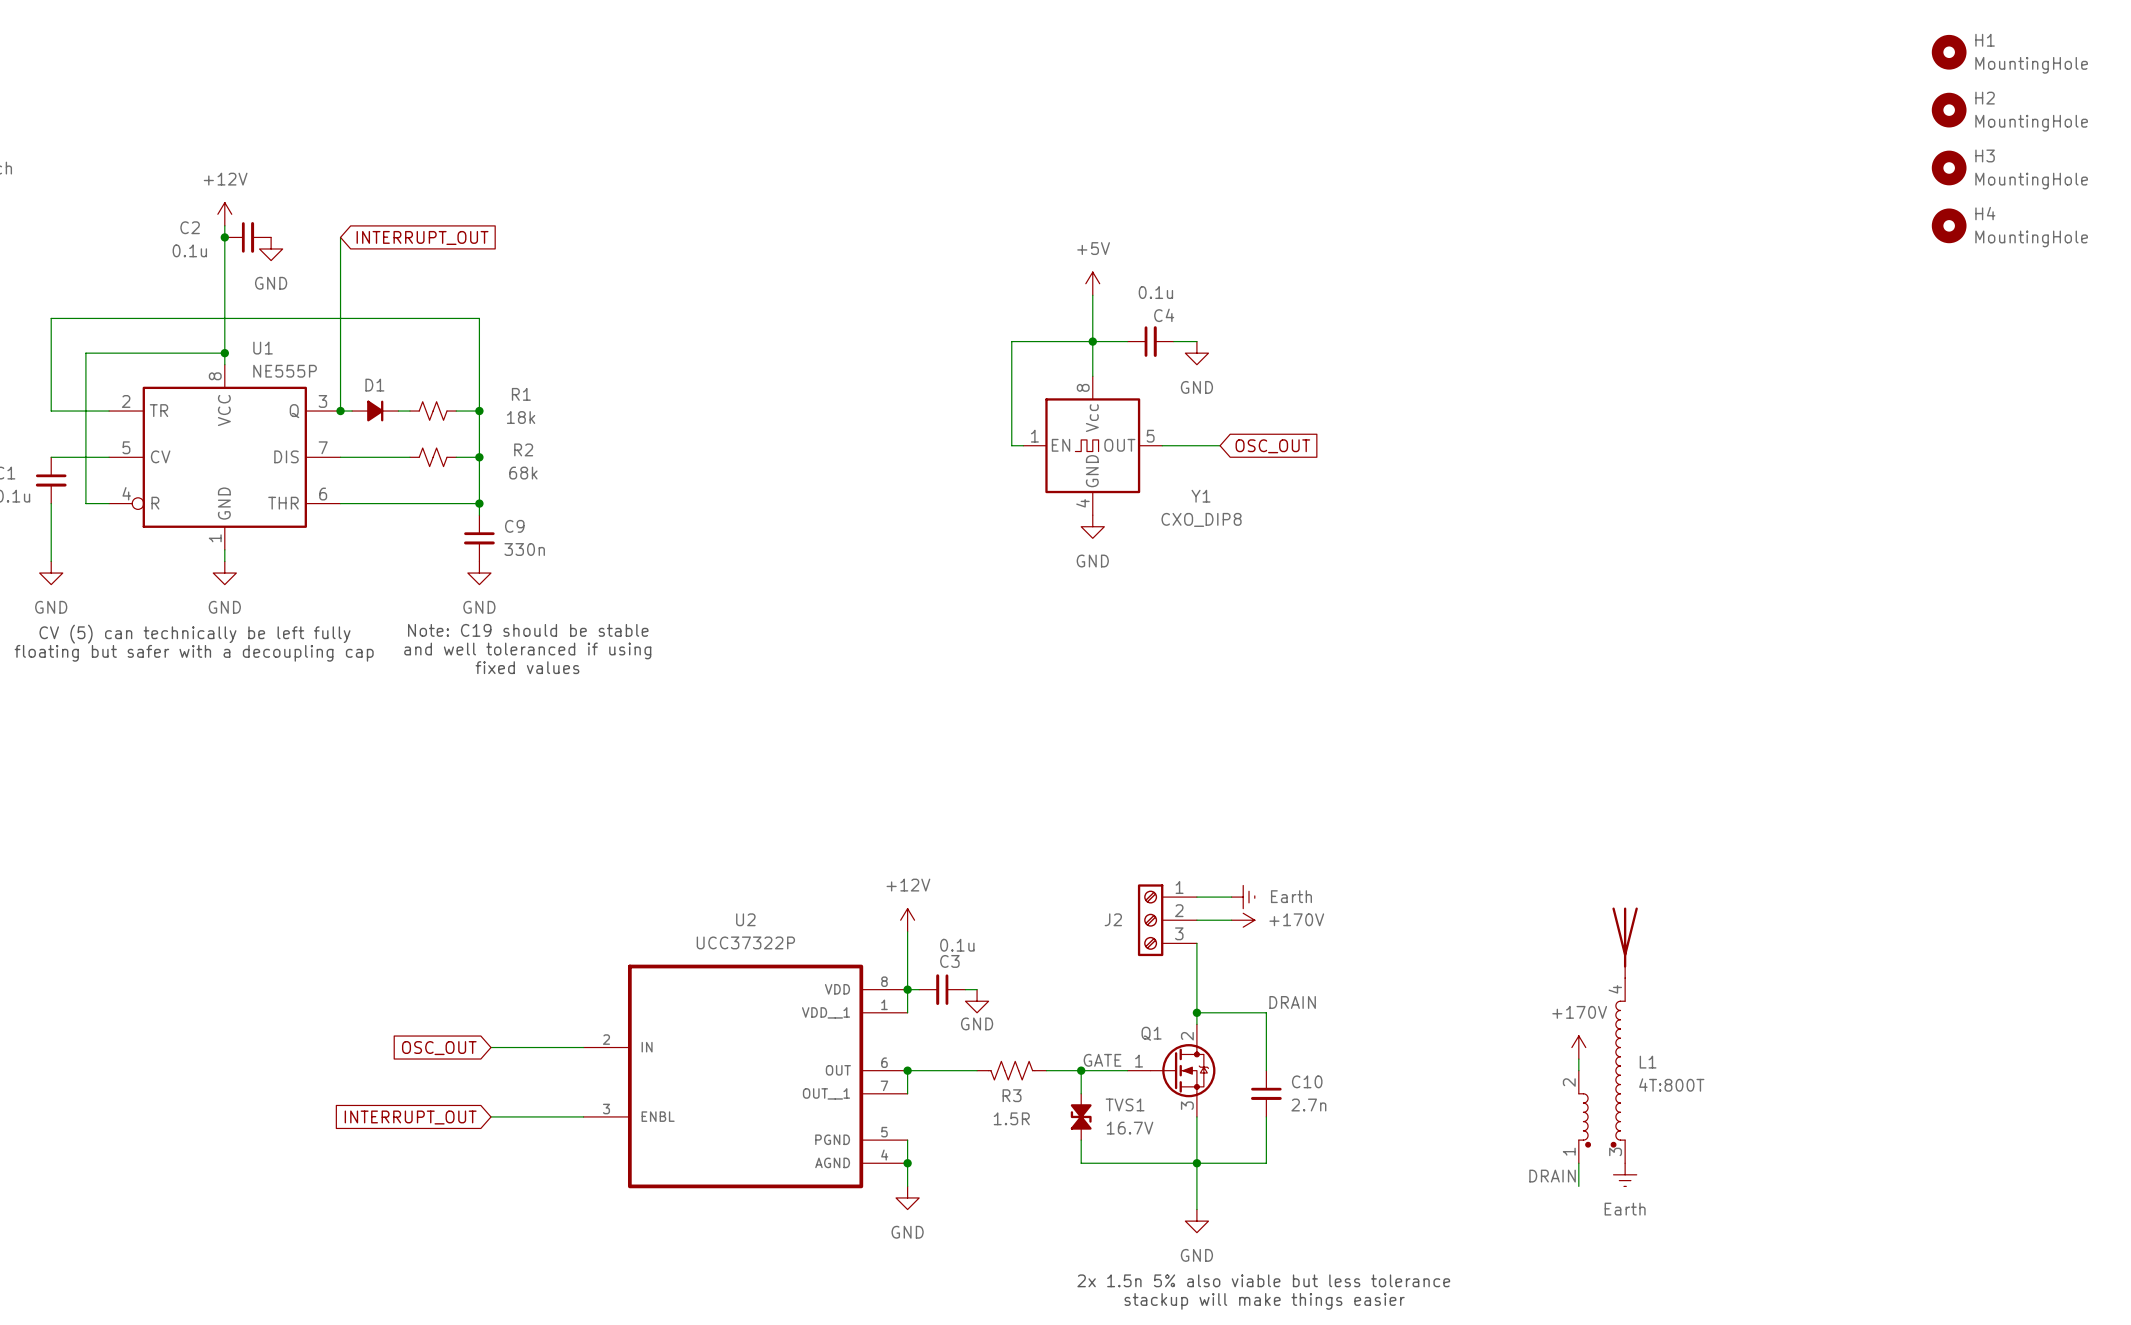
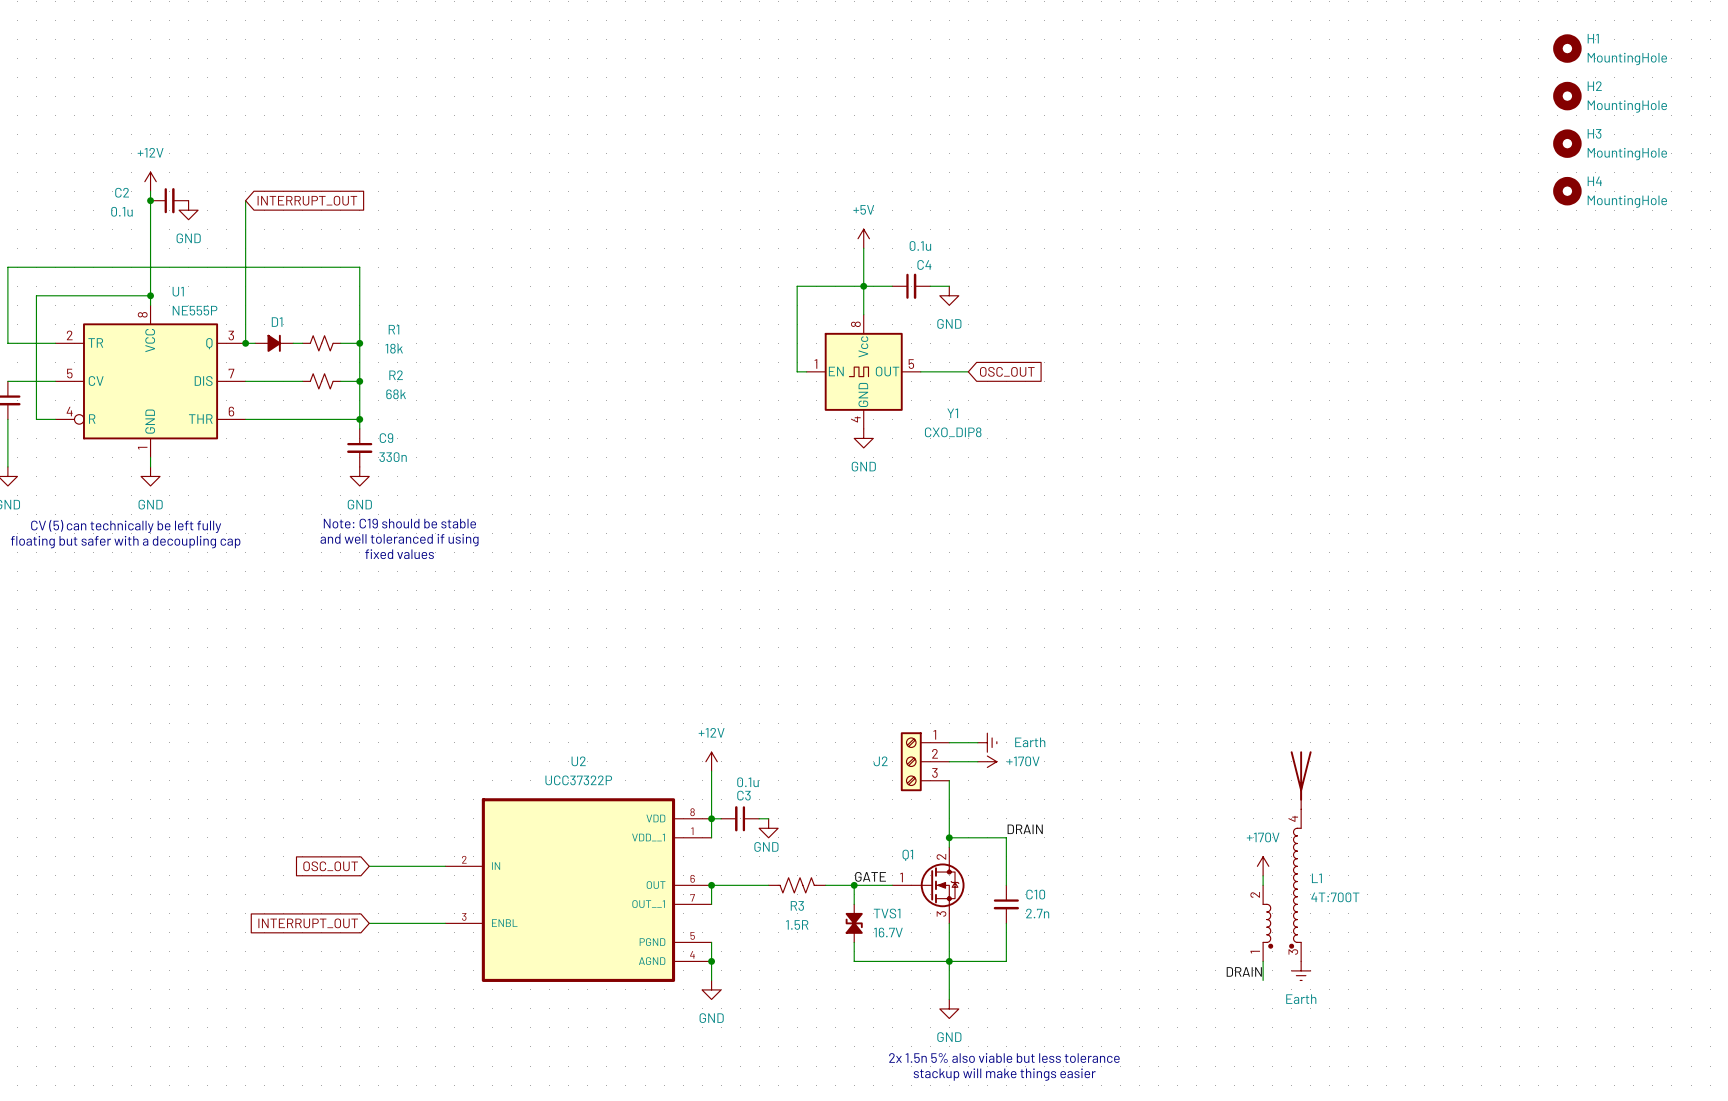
L1 value: 4T:800T (1671, 1085) -> 4T:700T (1335, 897)

